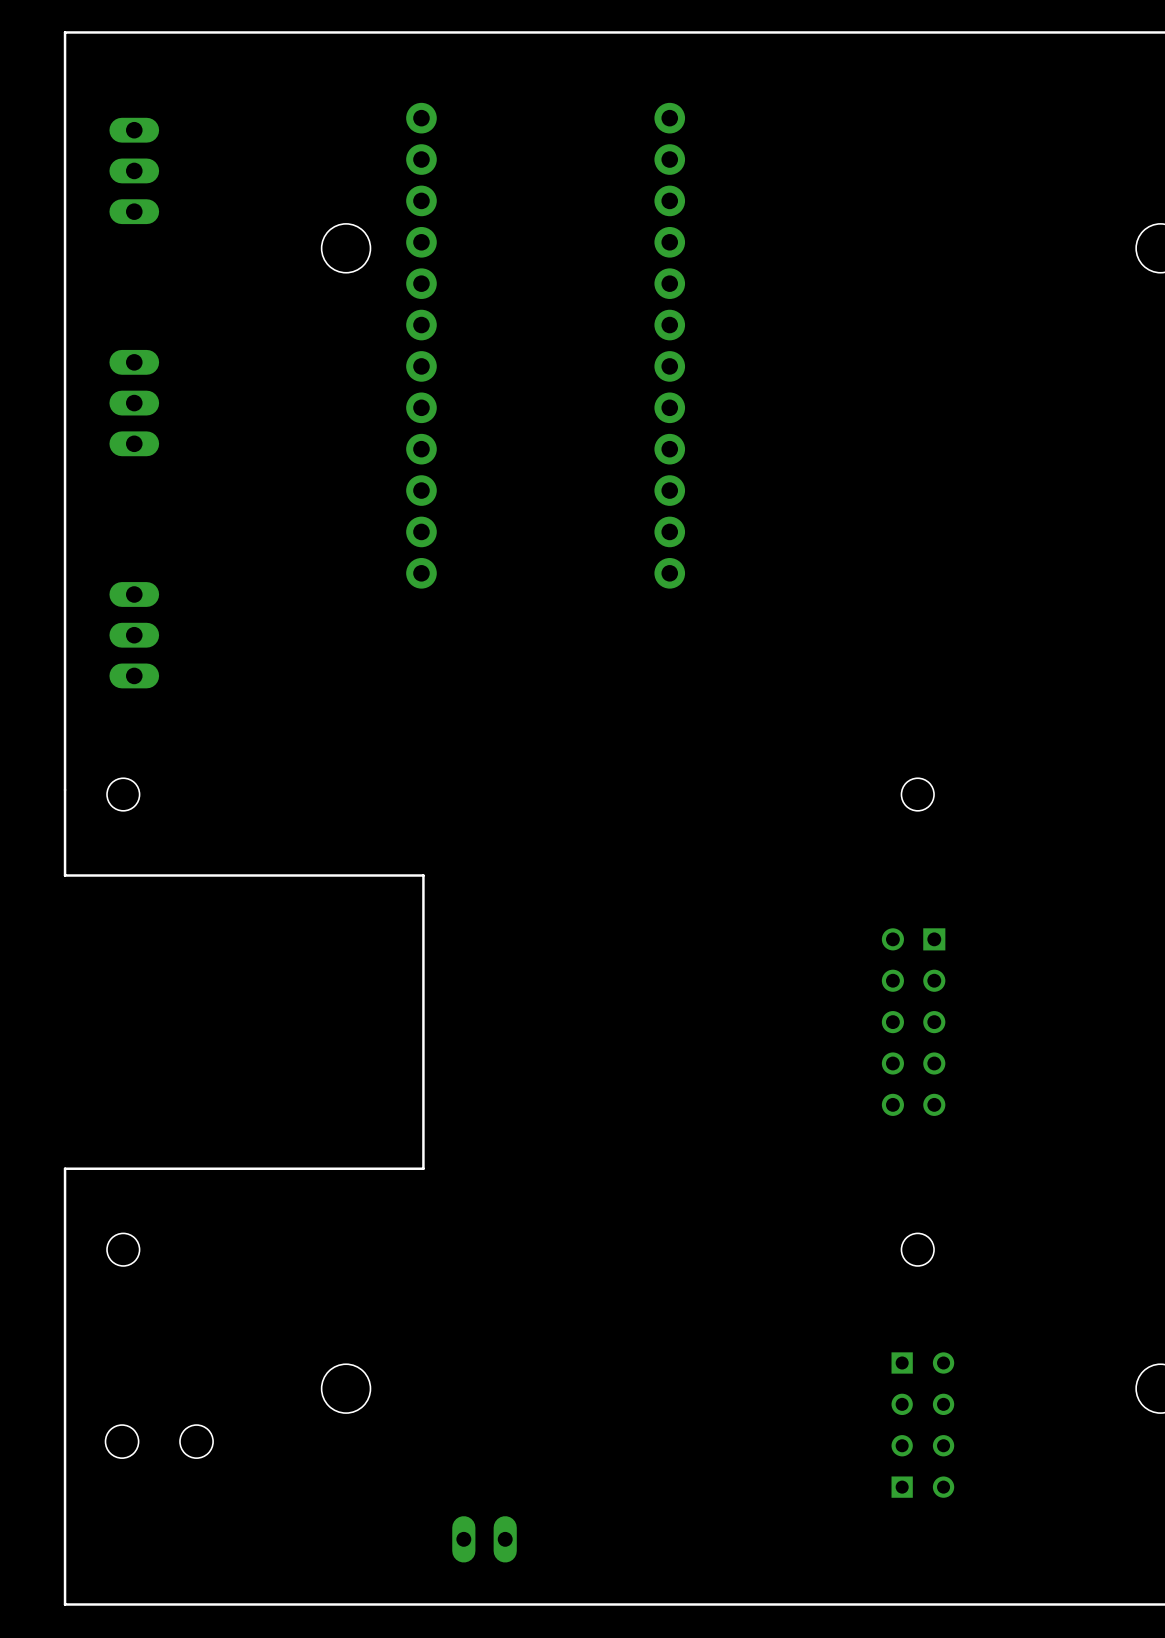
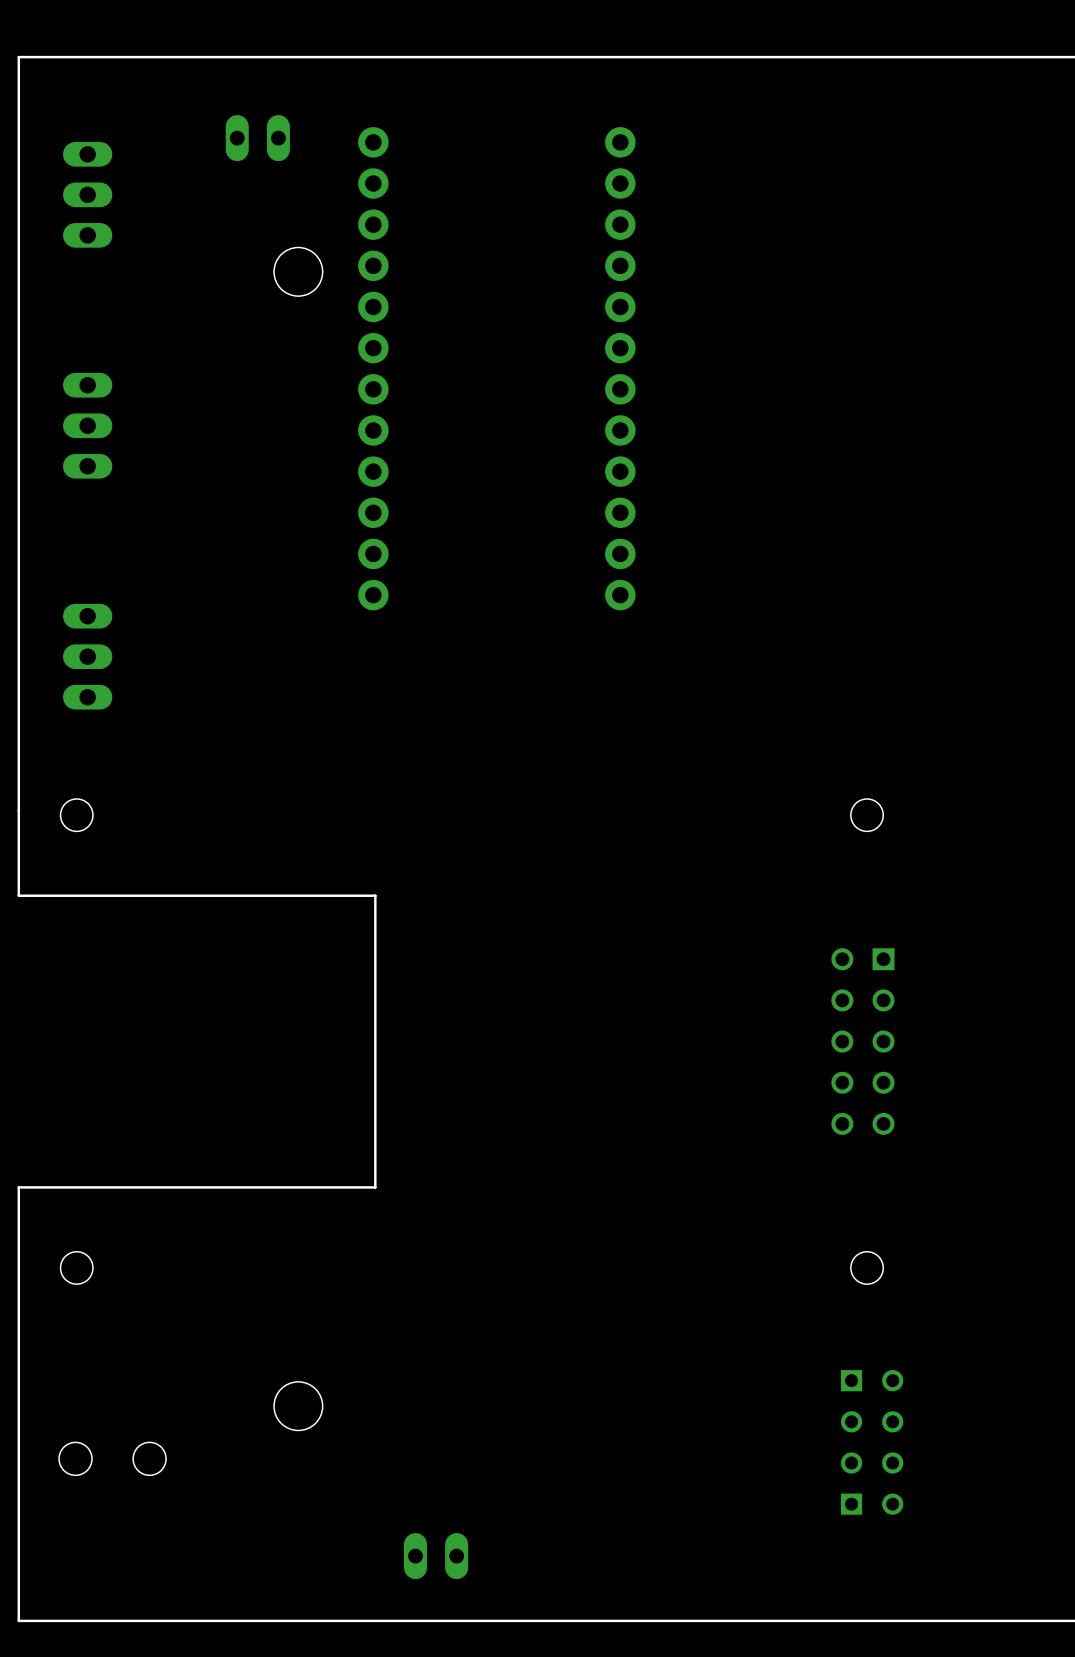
part: none -> (257, 138)

